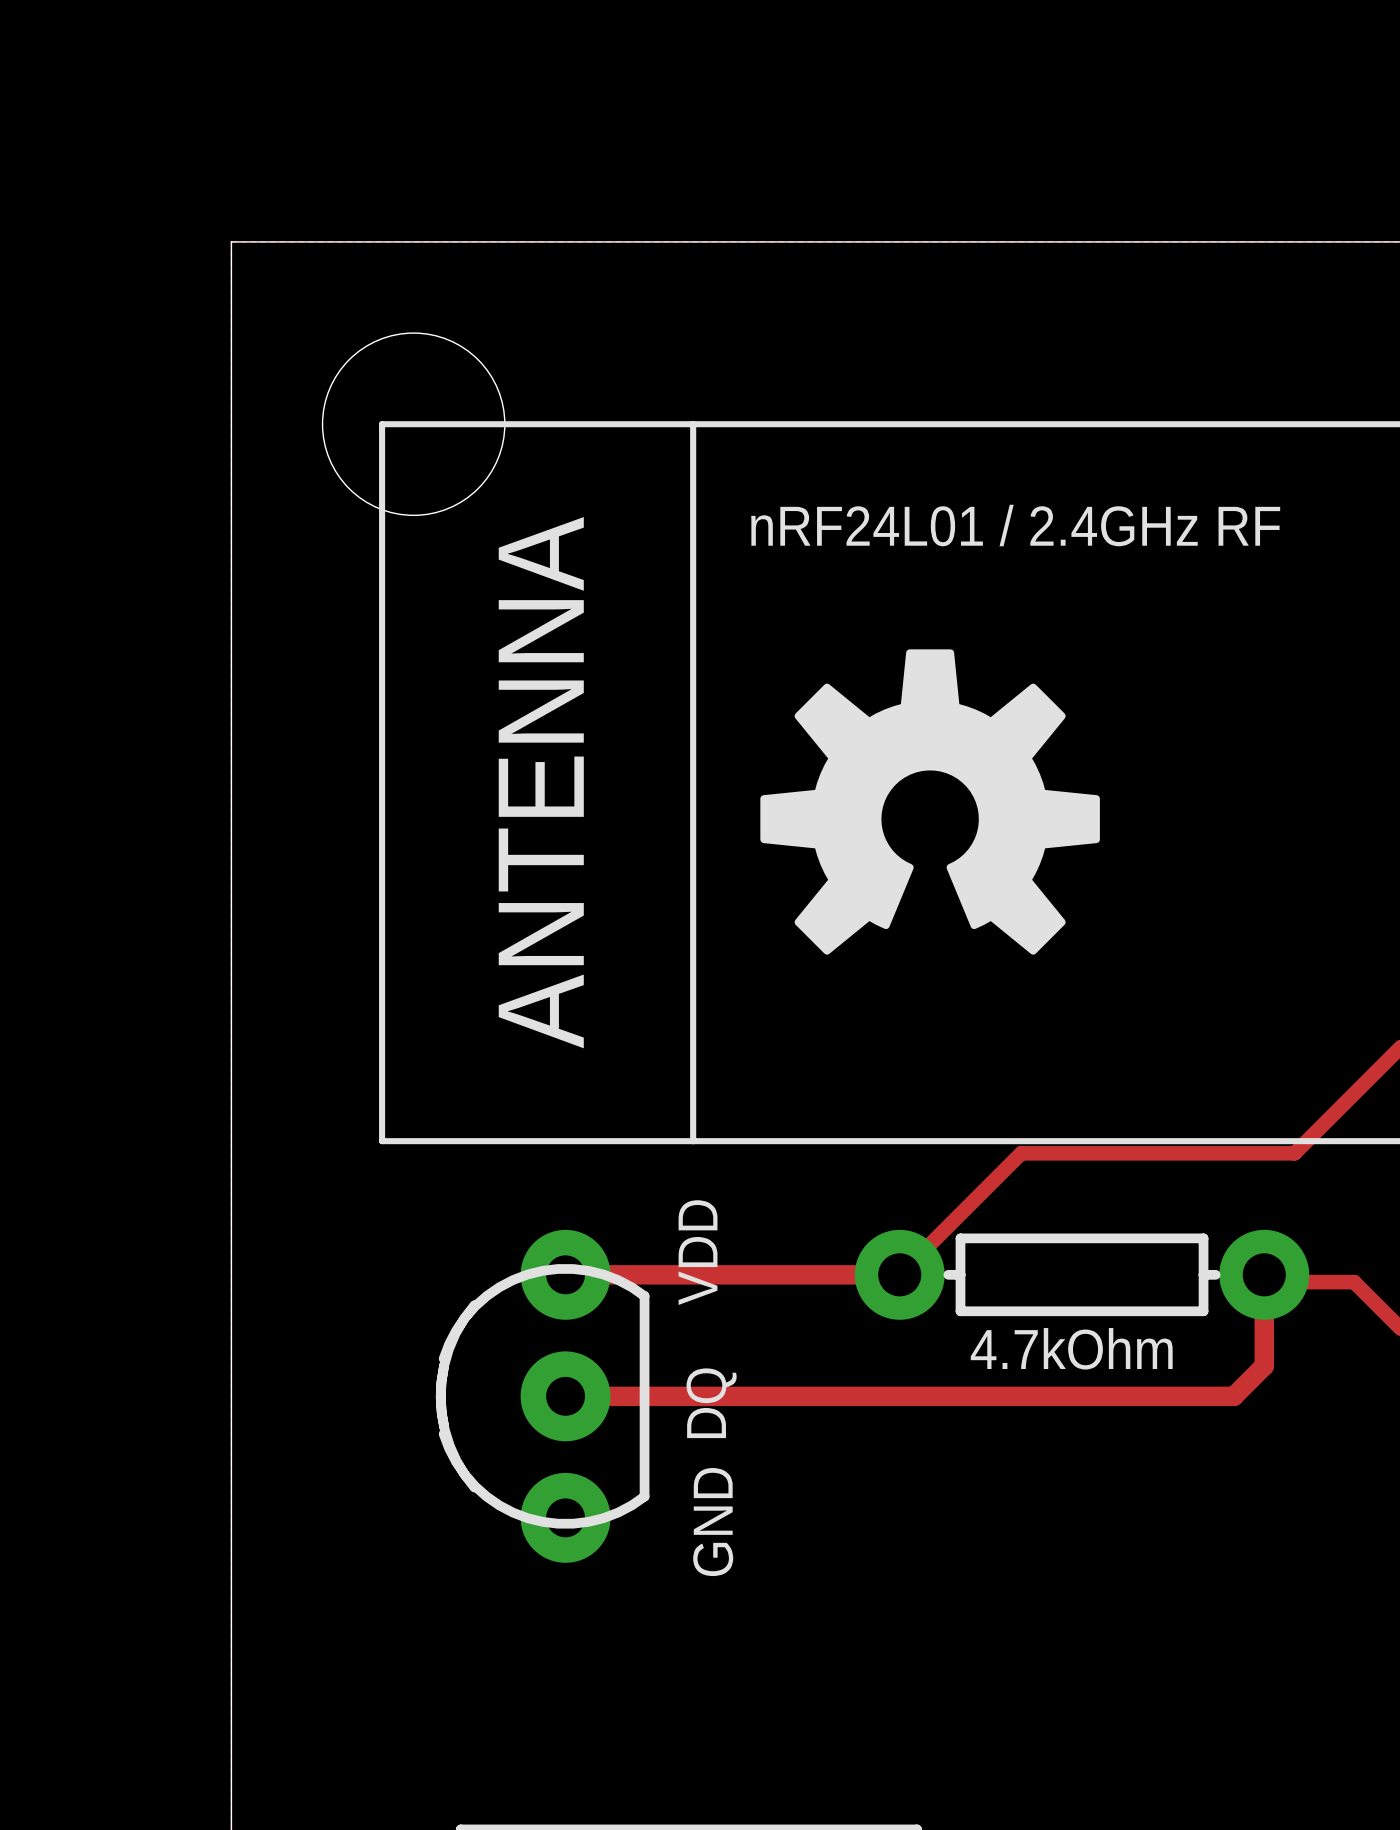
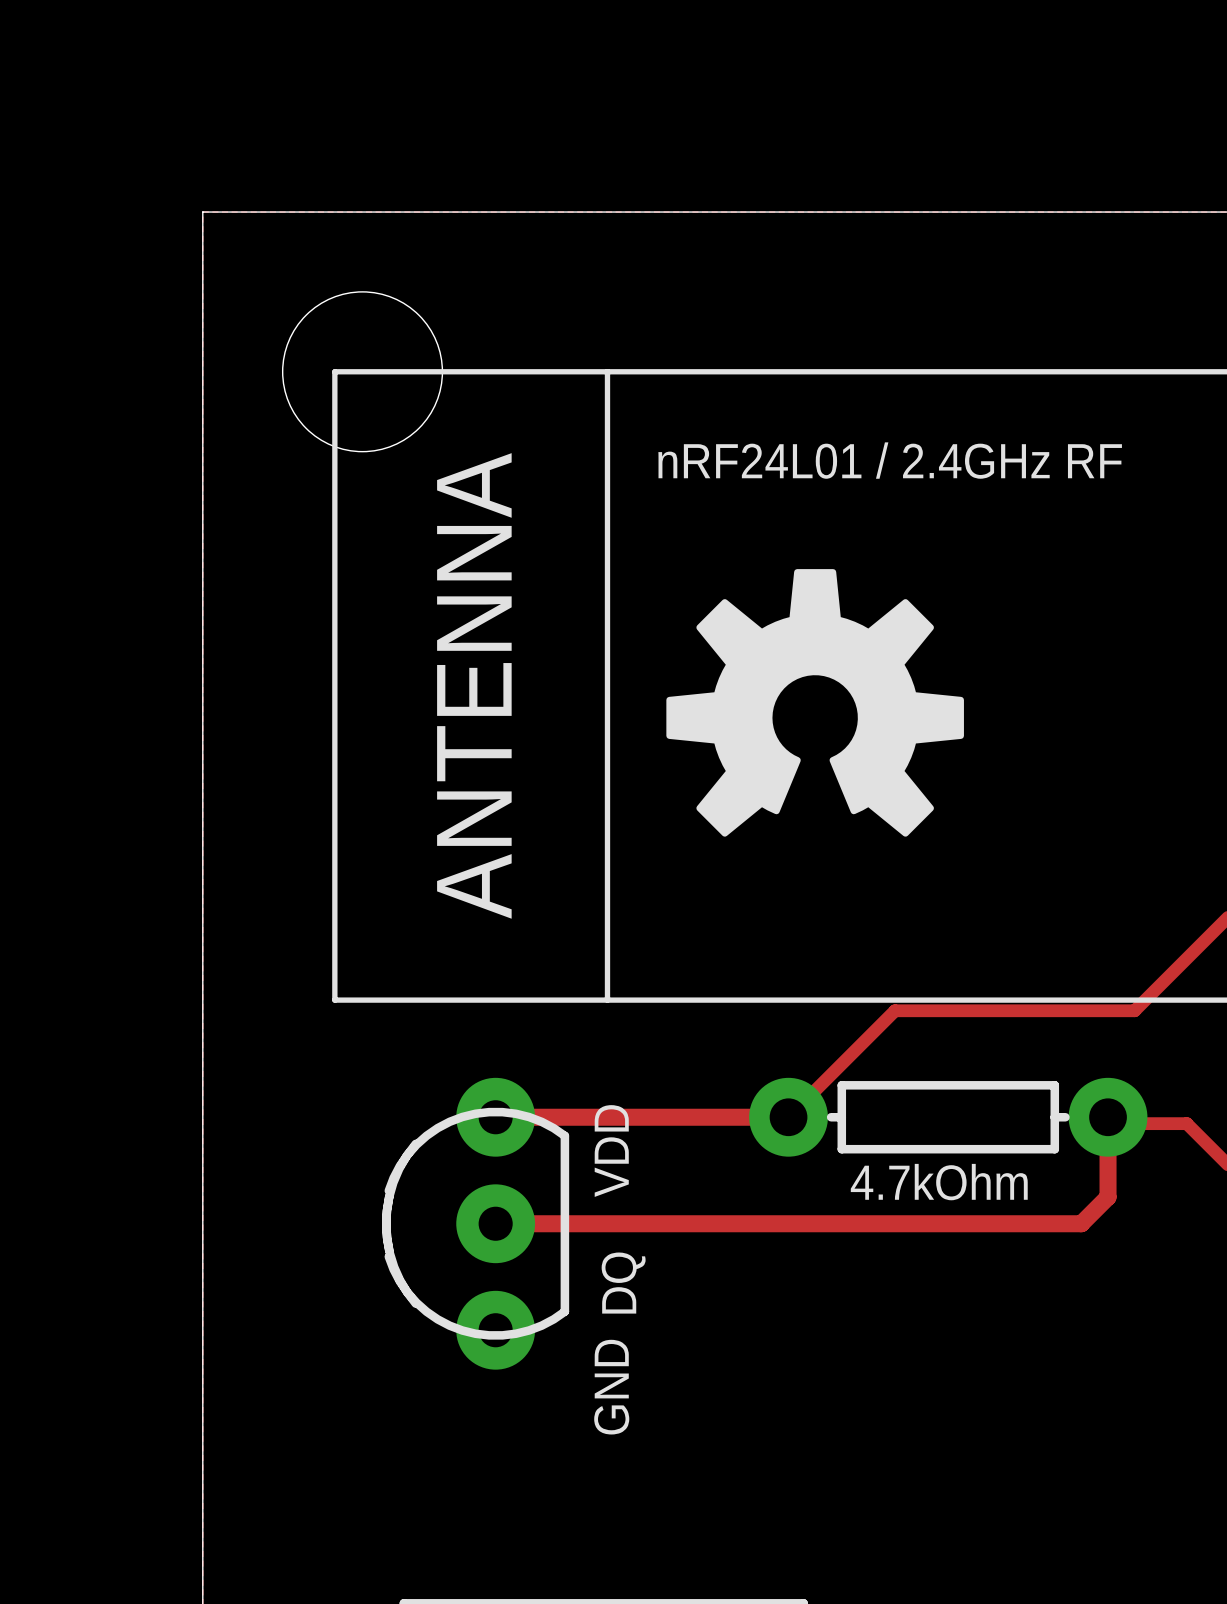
text position: VDD (698, 1252) -> VDD (611, 1151)
text position: DQ (711, 1403) -> DQ (623, 1283)
text position: GND (713, 1522) -> GND (611, 1387)

